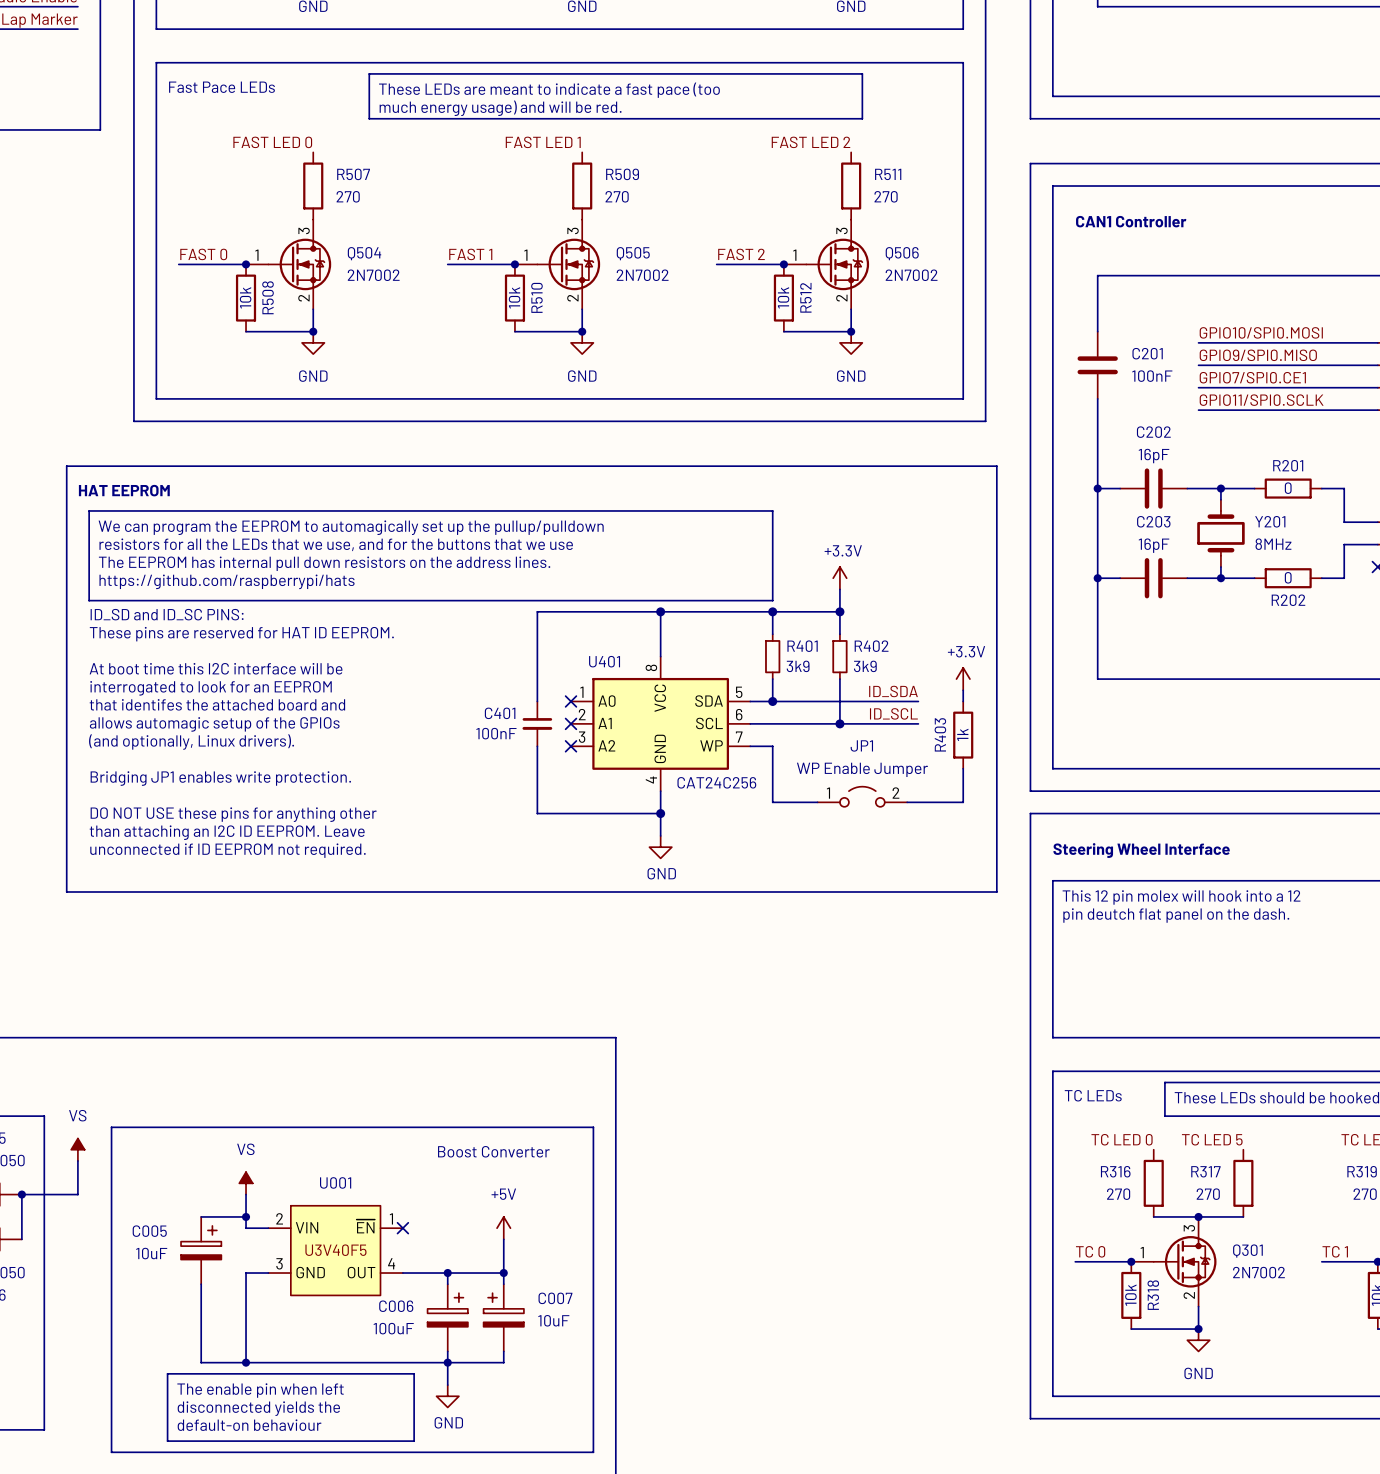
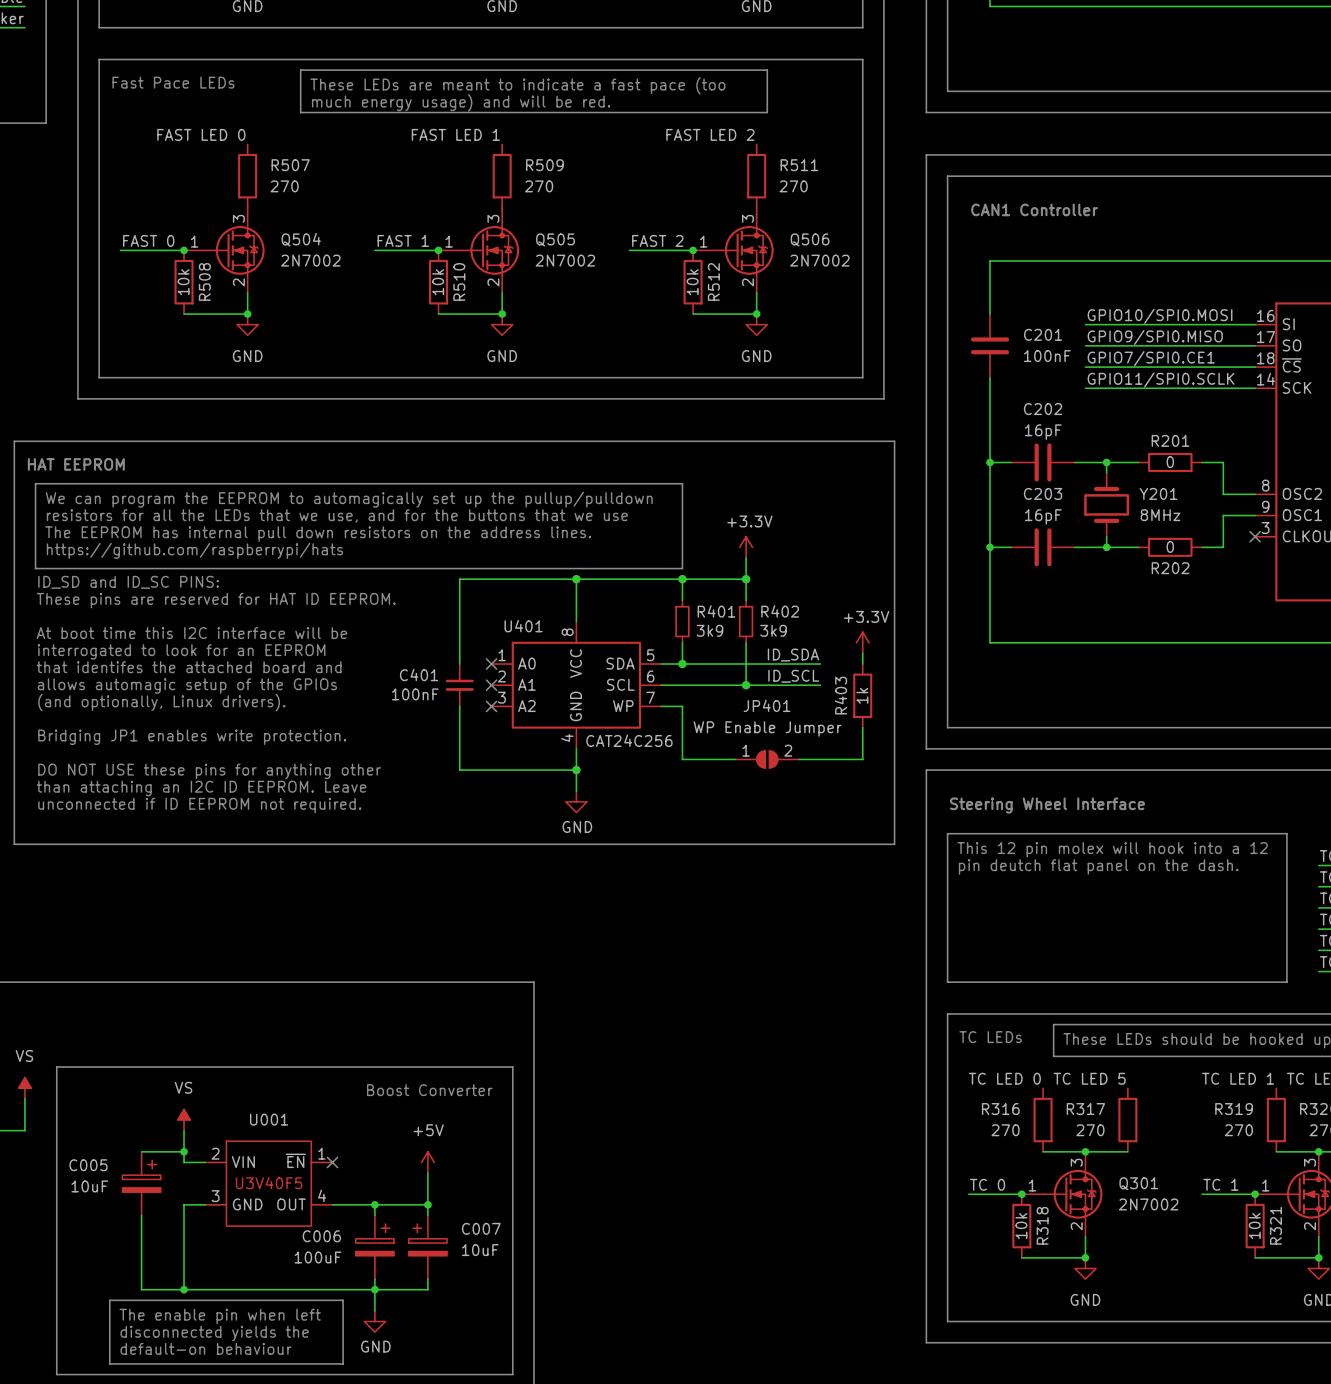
JP1: WP Enable Jumper (862, 796) -> none
JP401: none -> WP Enable Jumper (767, 759)

